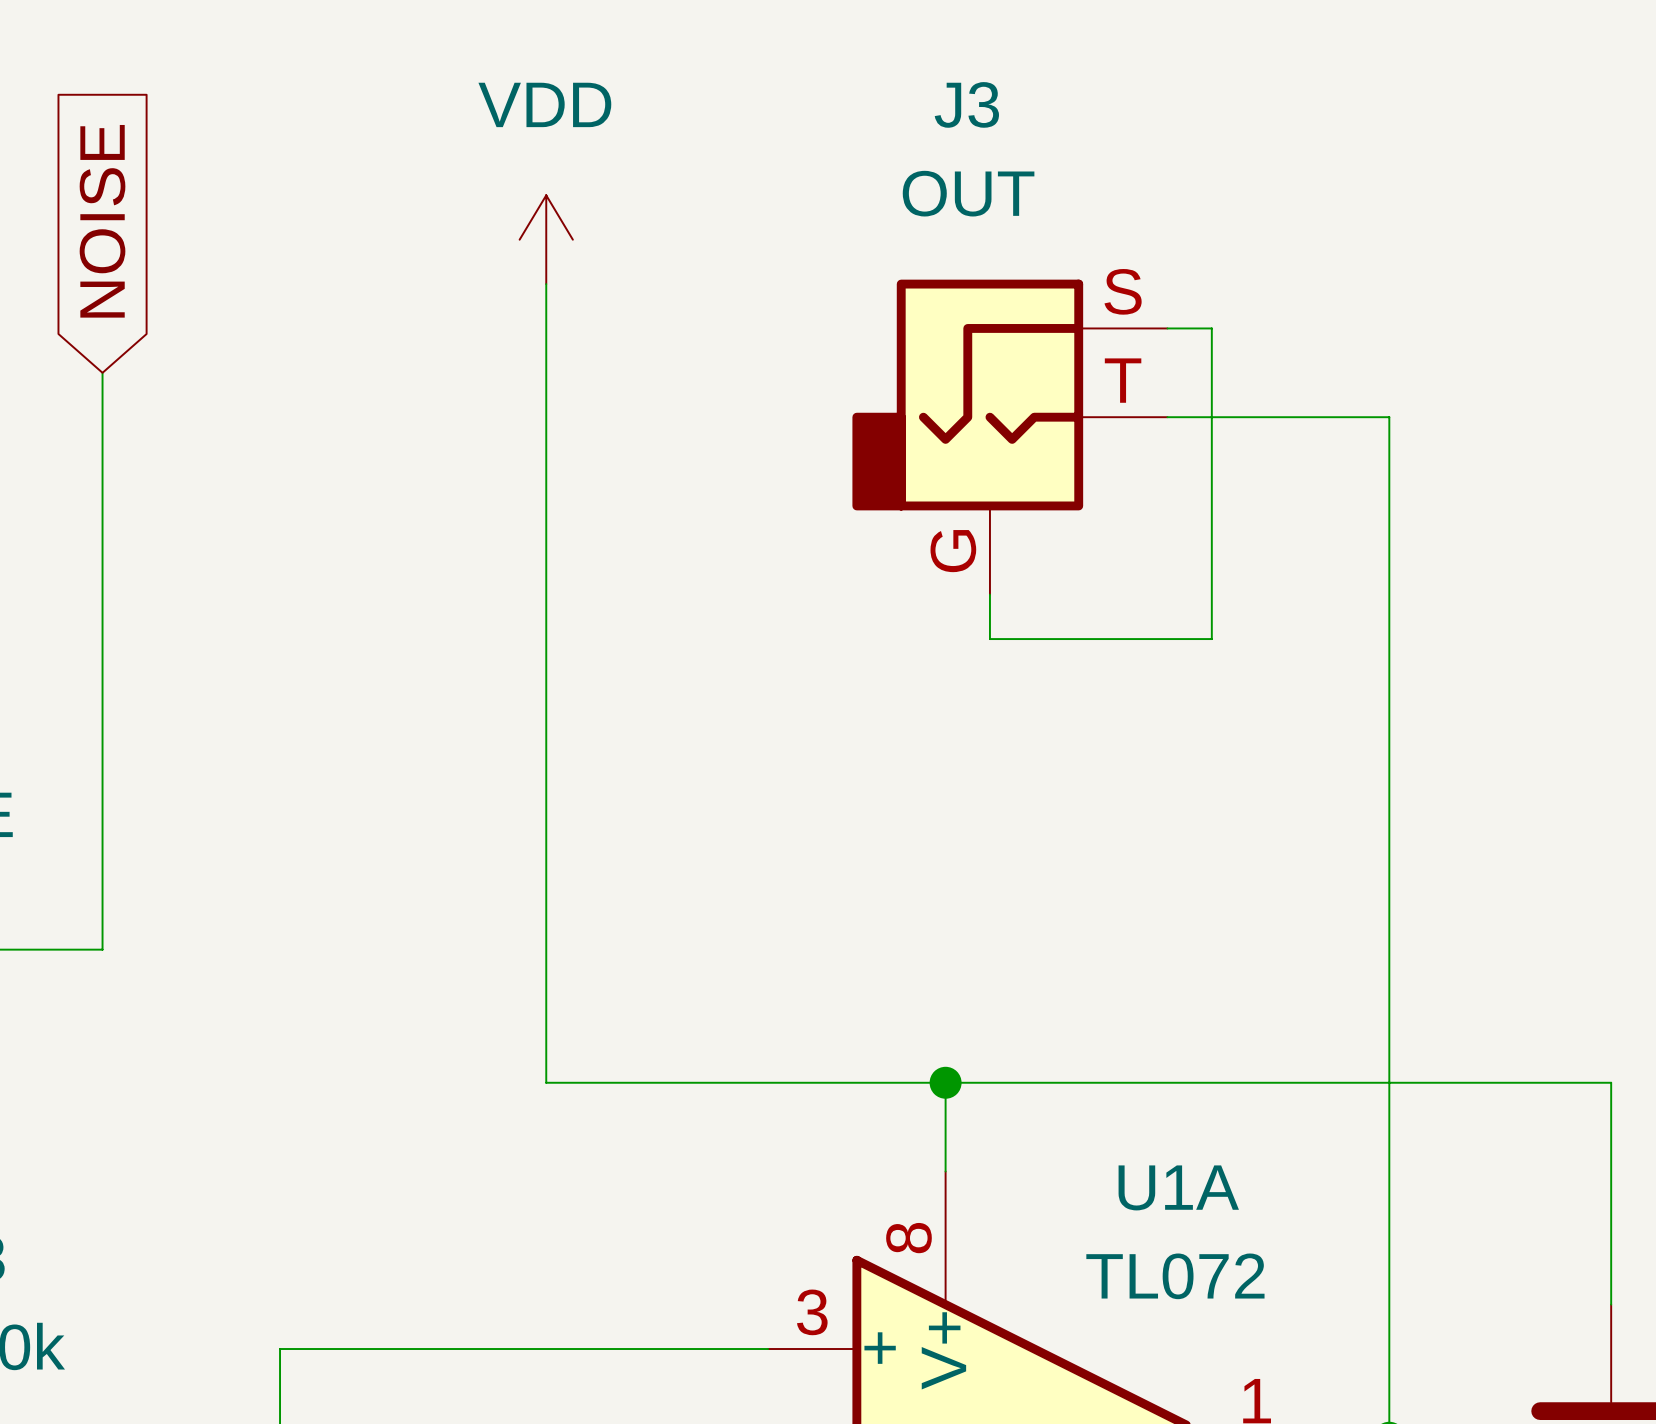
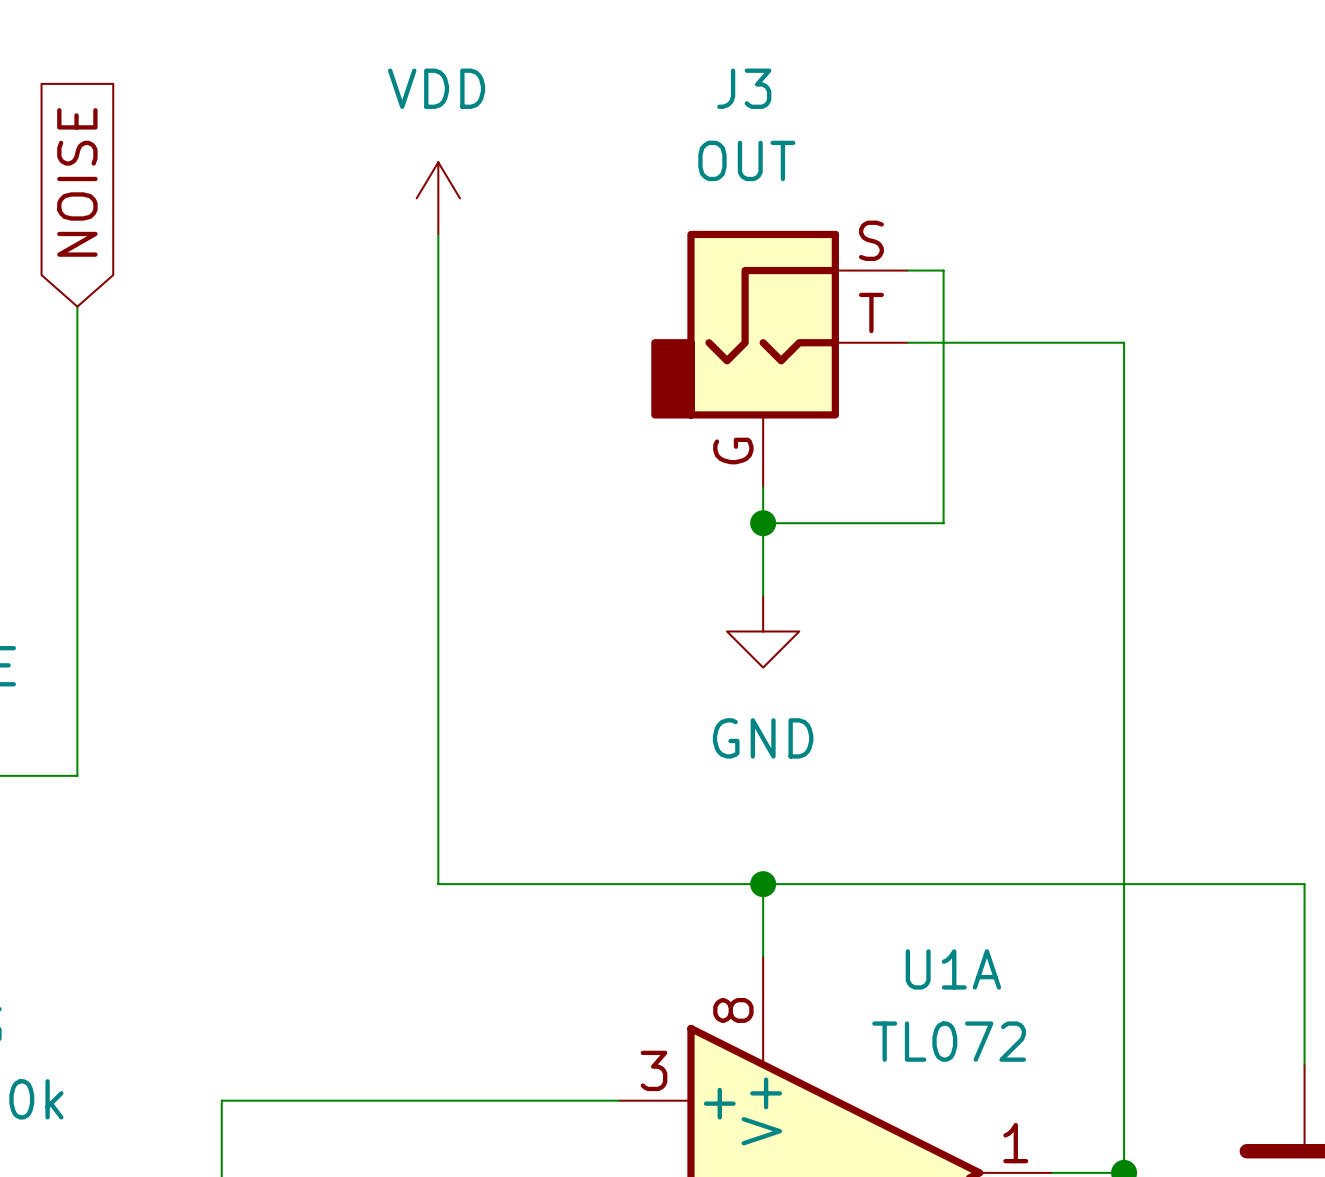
wire: (1167, 328) (1211, 328) (1211, 639) (1167, 639) -> (907, 270) (943, 270) (943, 523)
J3 position: (1009, 437) -> (779, 358)
wire: none -> (763, 487) (763, 595)
wire: (989, 594) (989, 639) -> (763, 523) (799, 523)
junction: none -> (763, 523)
power symbol: none -> GND (763, 631)

